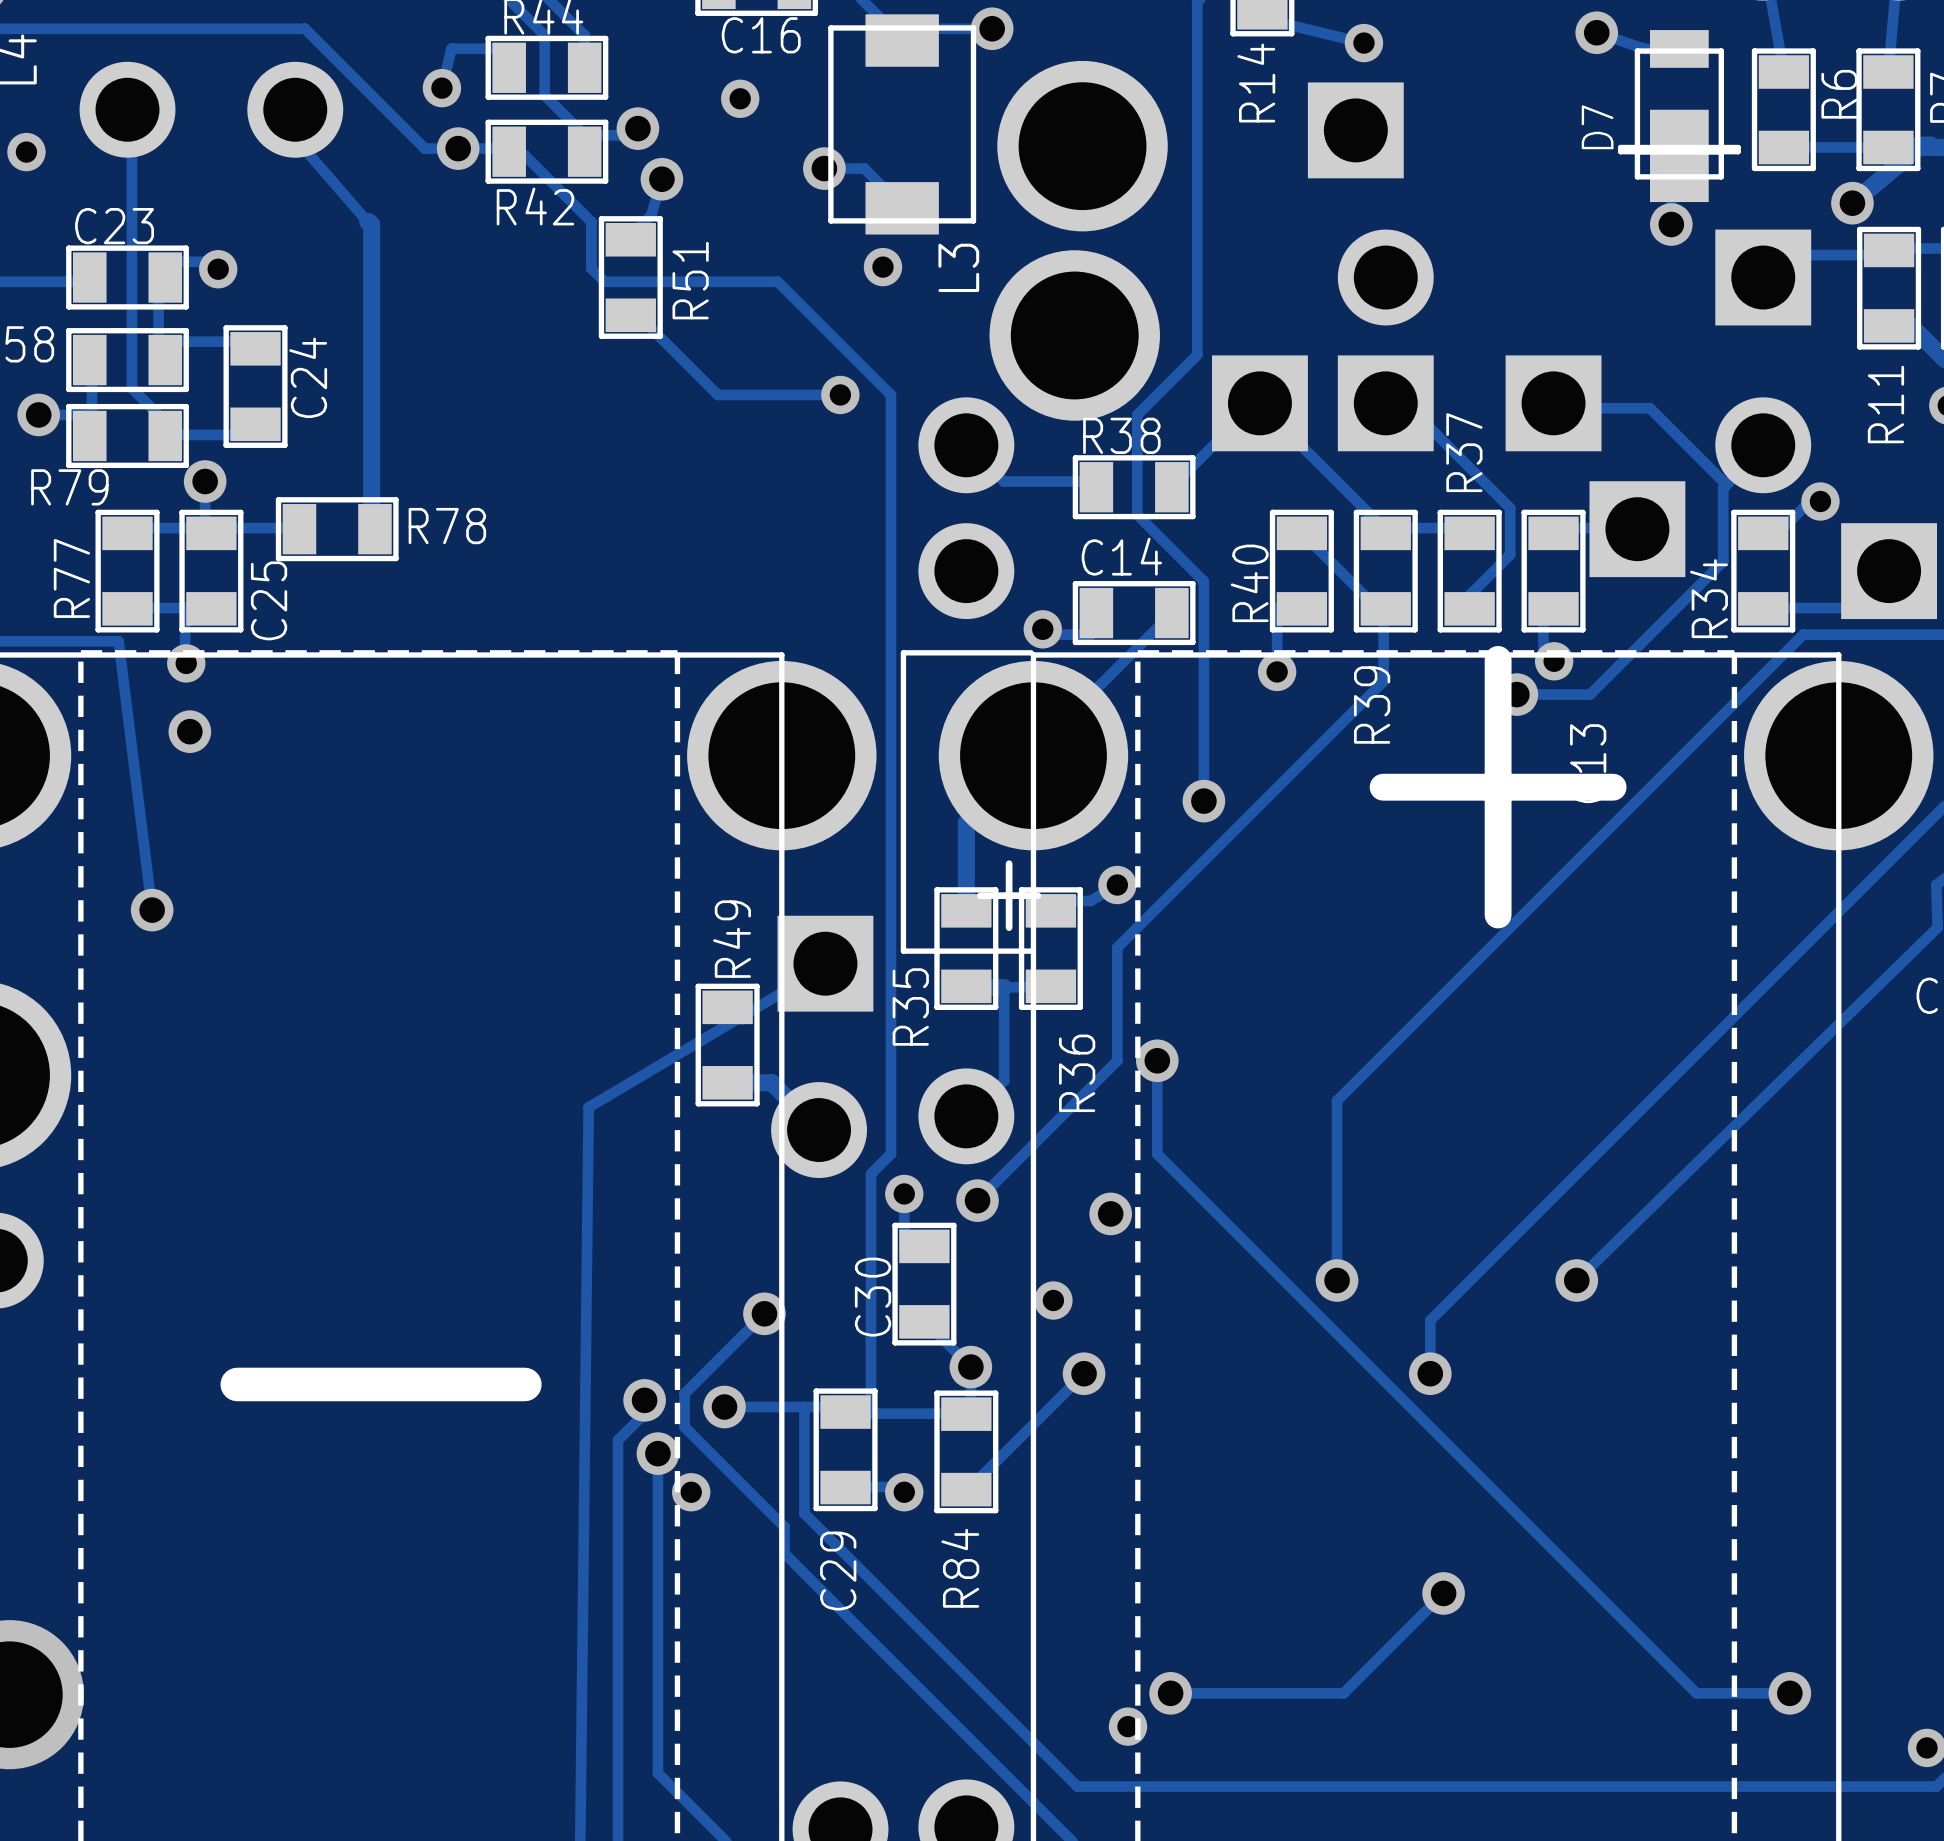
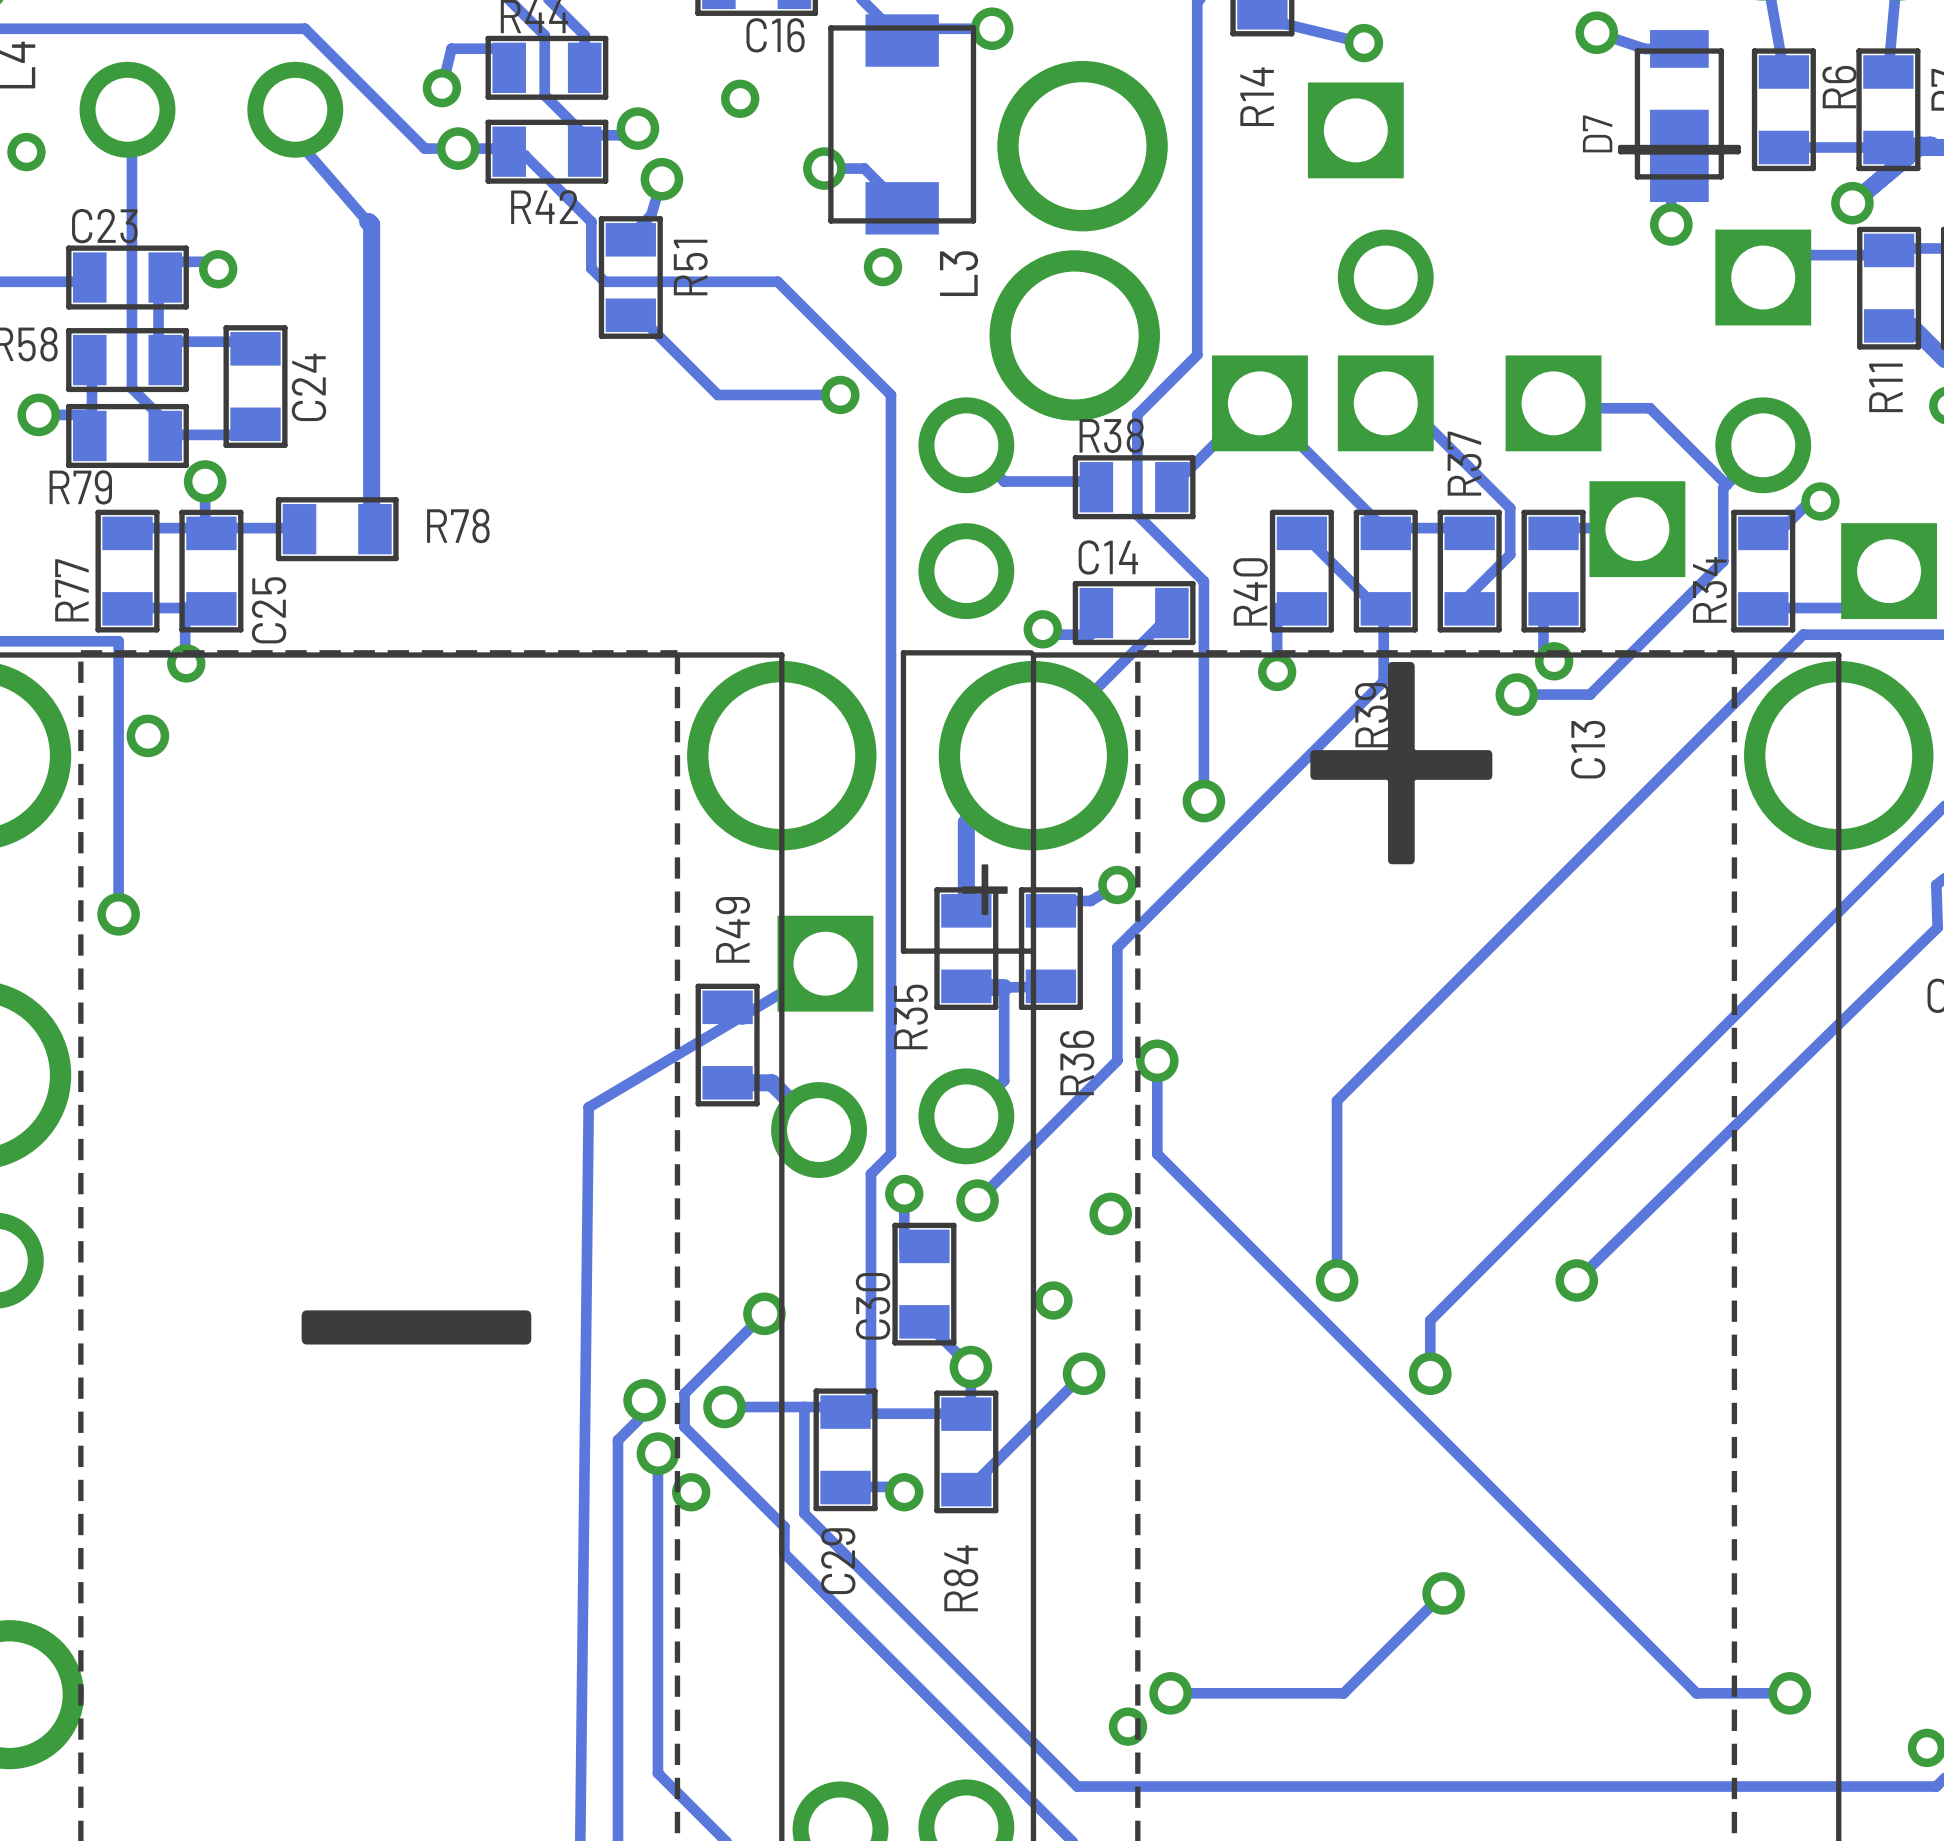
track: (118, 641) (152, 910) -> (118, 641) (118, 914)
via position: (189, 731) -> (147, 735)
via position: (152, 910) -> (118, 914)

